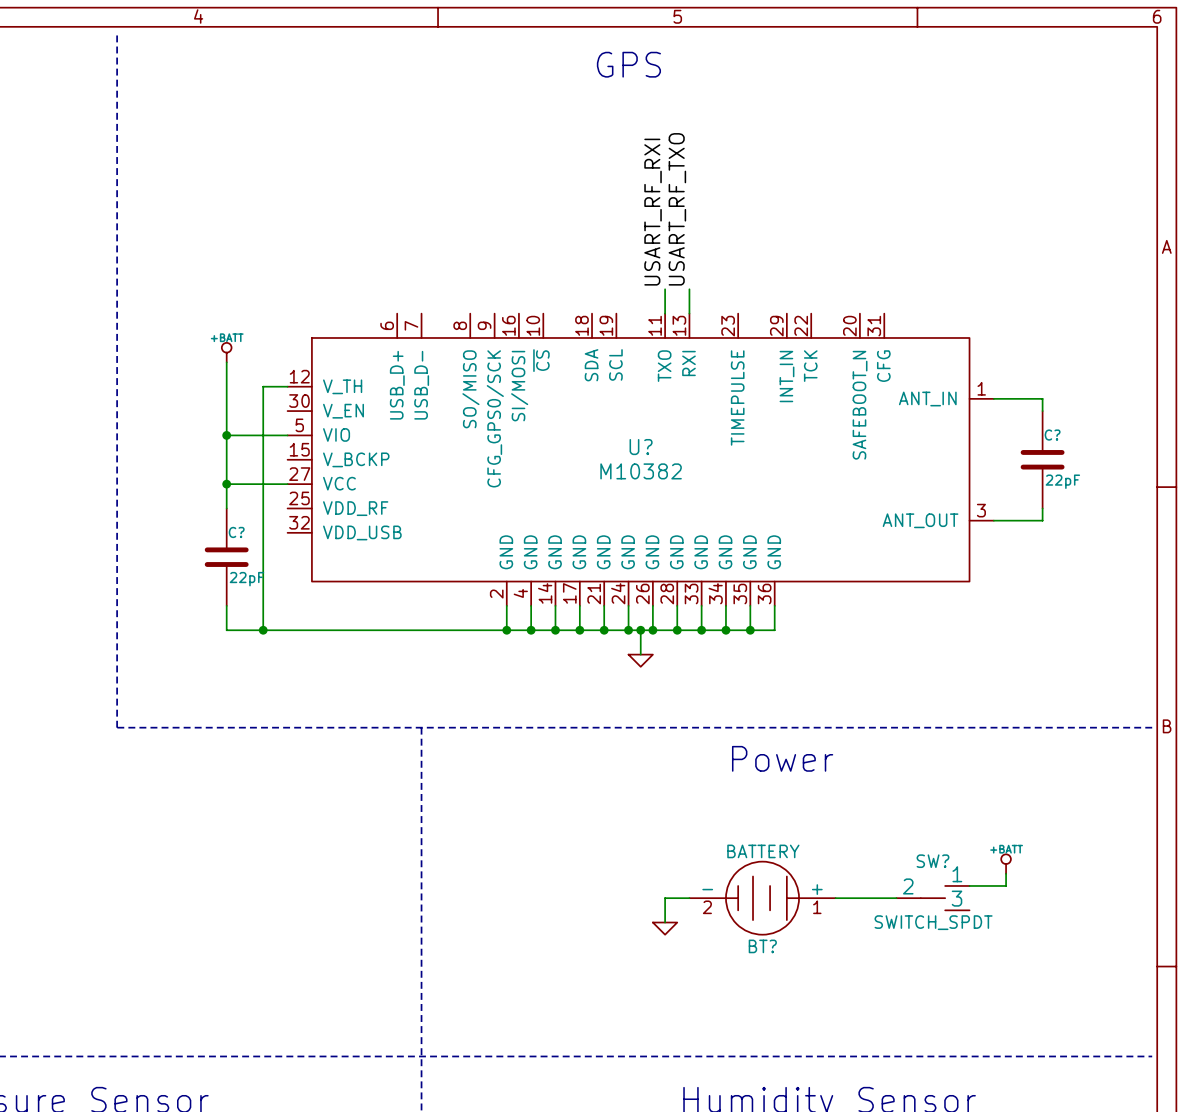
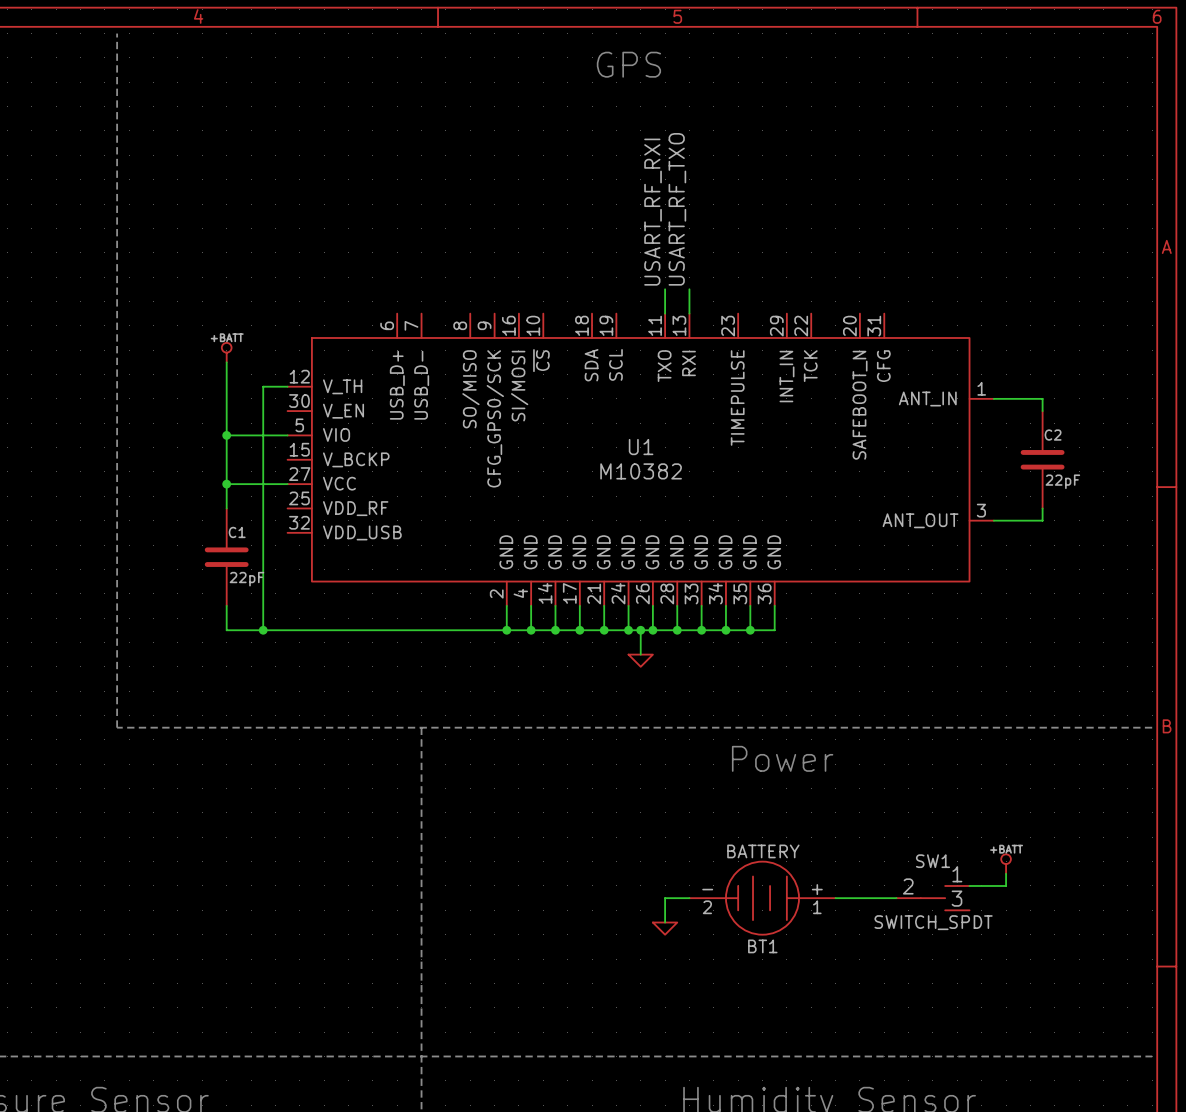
C? name: C? (1052, 435) -> C2 (1053, 435)
U? name: U? (641, 447) -> U1 (641, 447)
C? name: C? (236, 532) -> C1 (237, 532)
SW? name: SW? (932, 861) -> SW1 (932, 861)
BT? name: BT? (762, 946) -> BT1 (762, 946)

